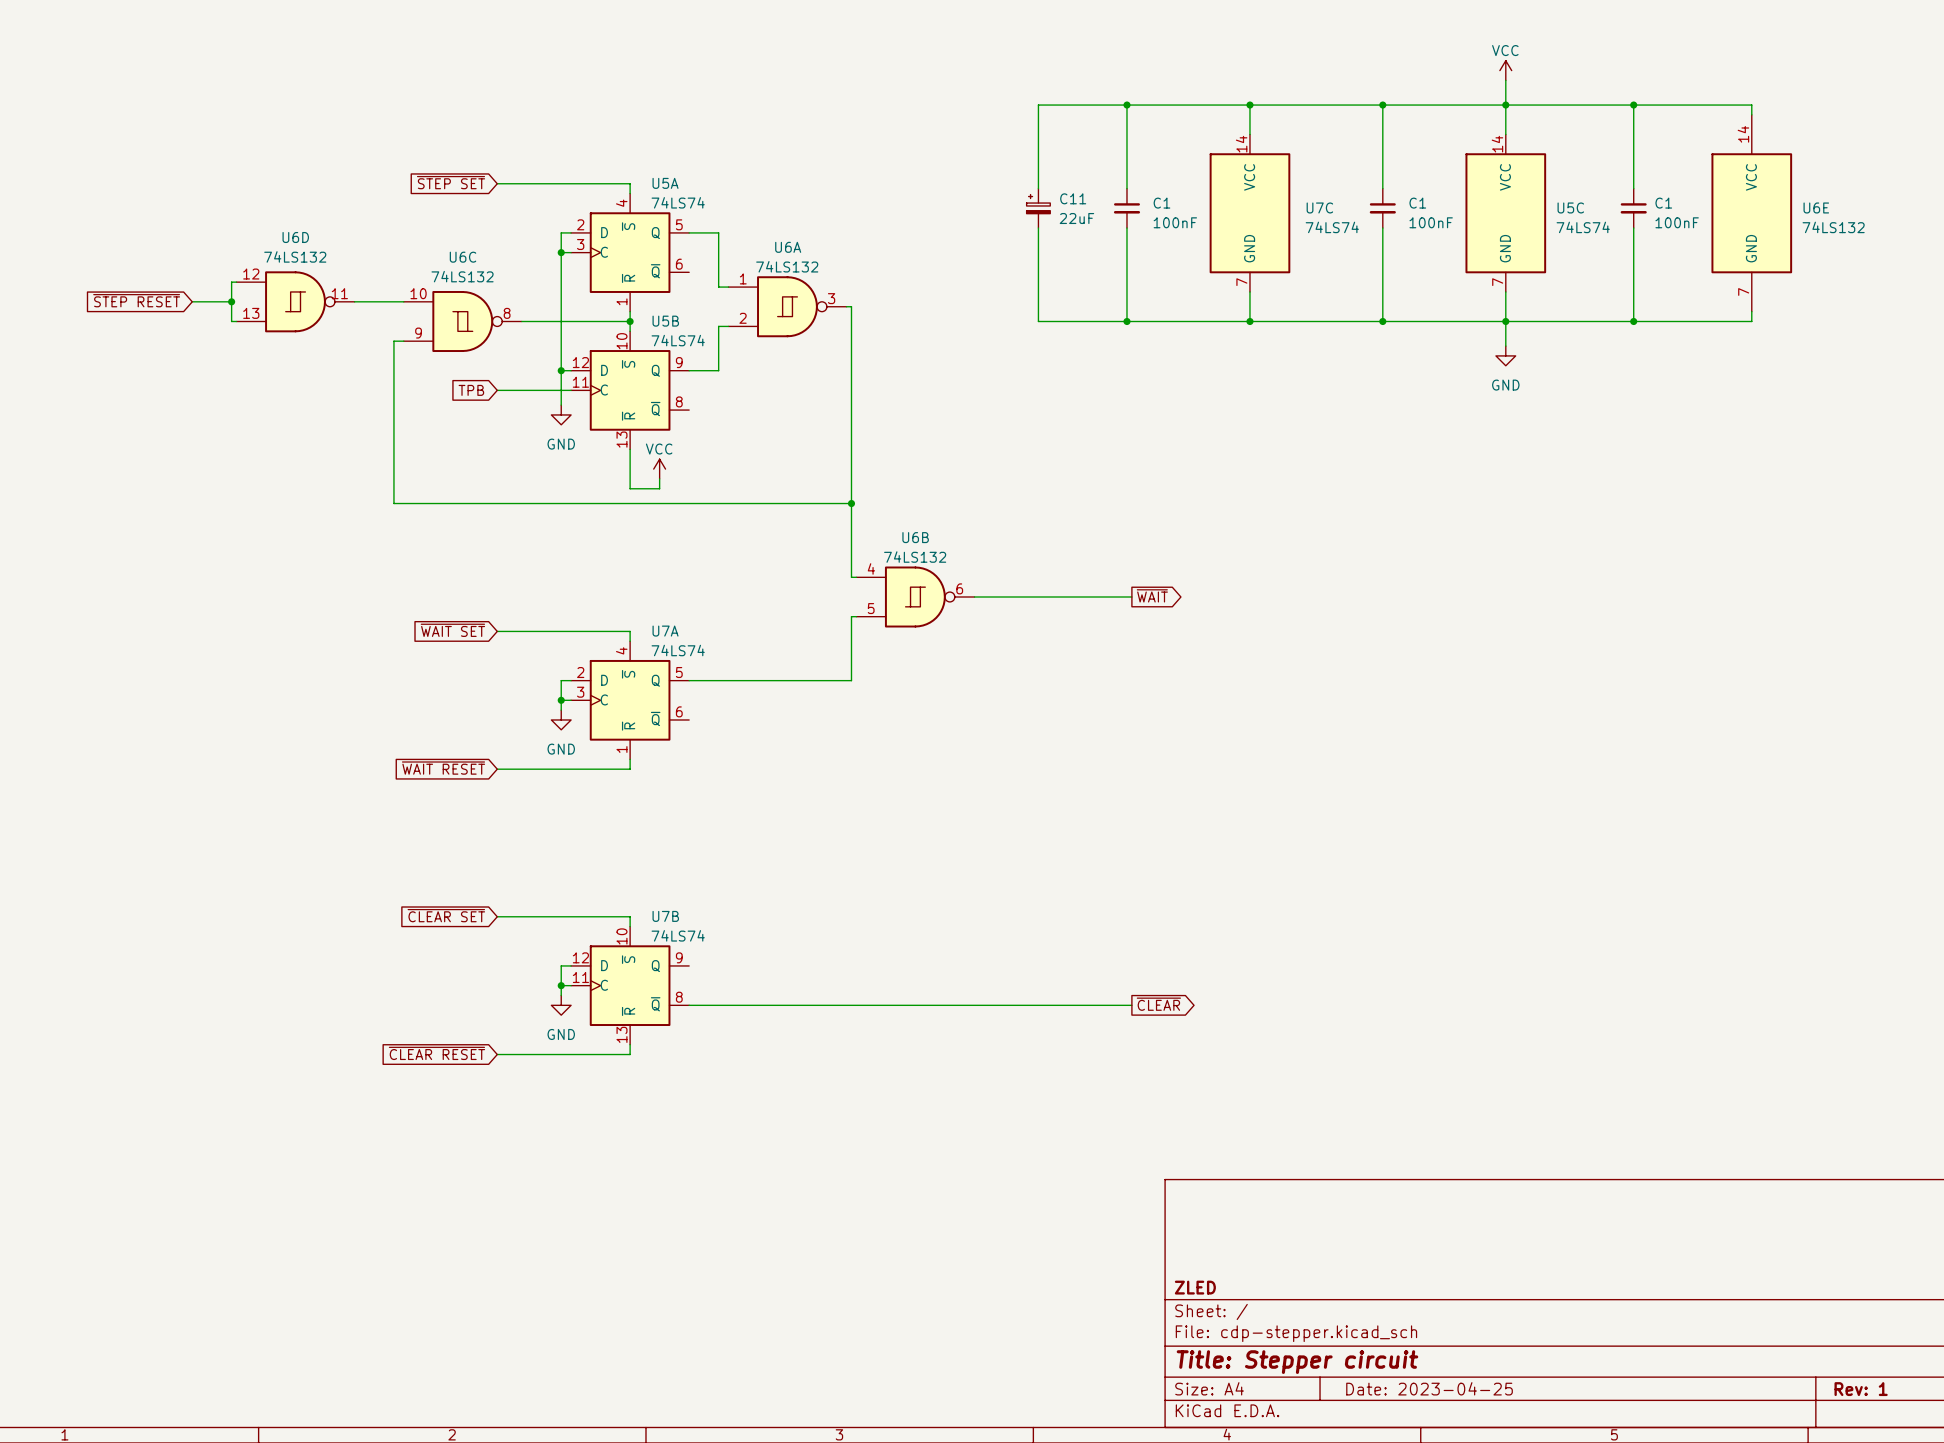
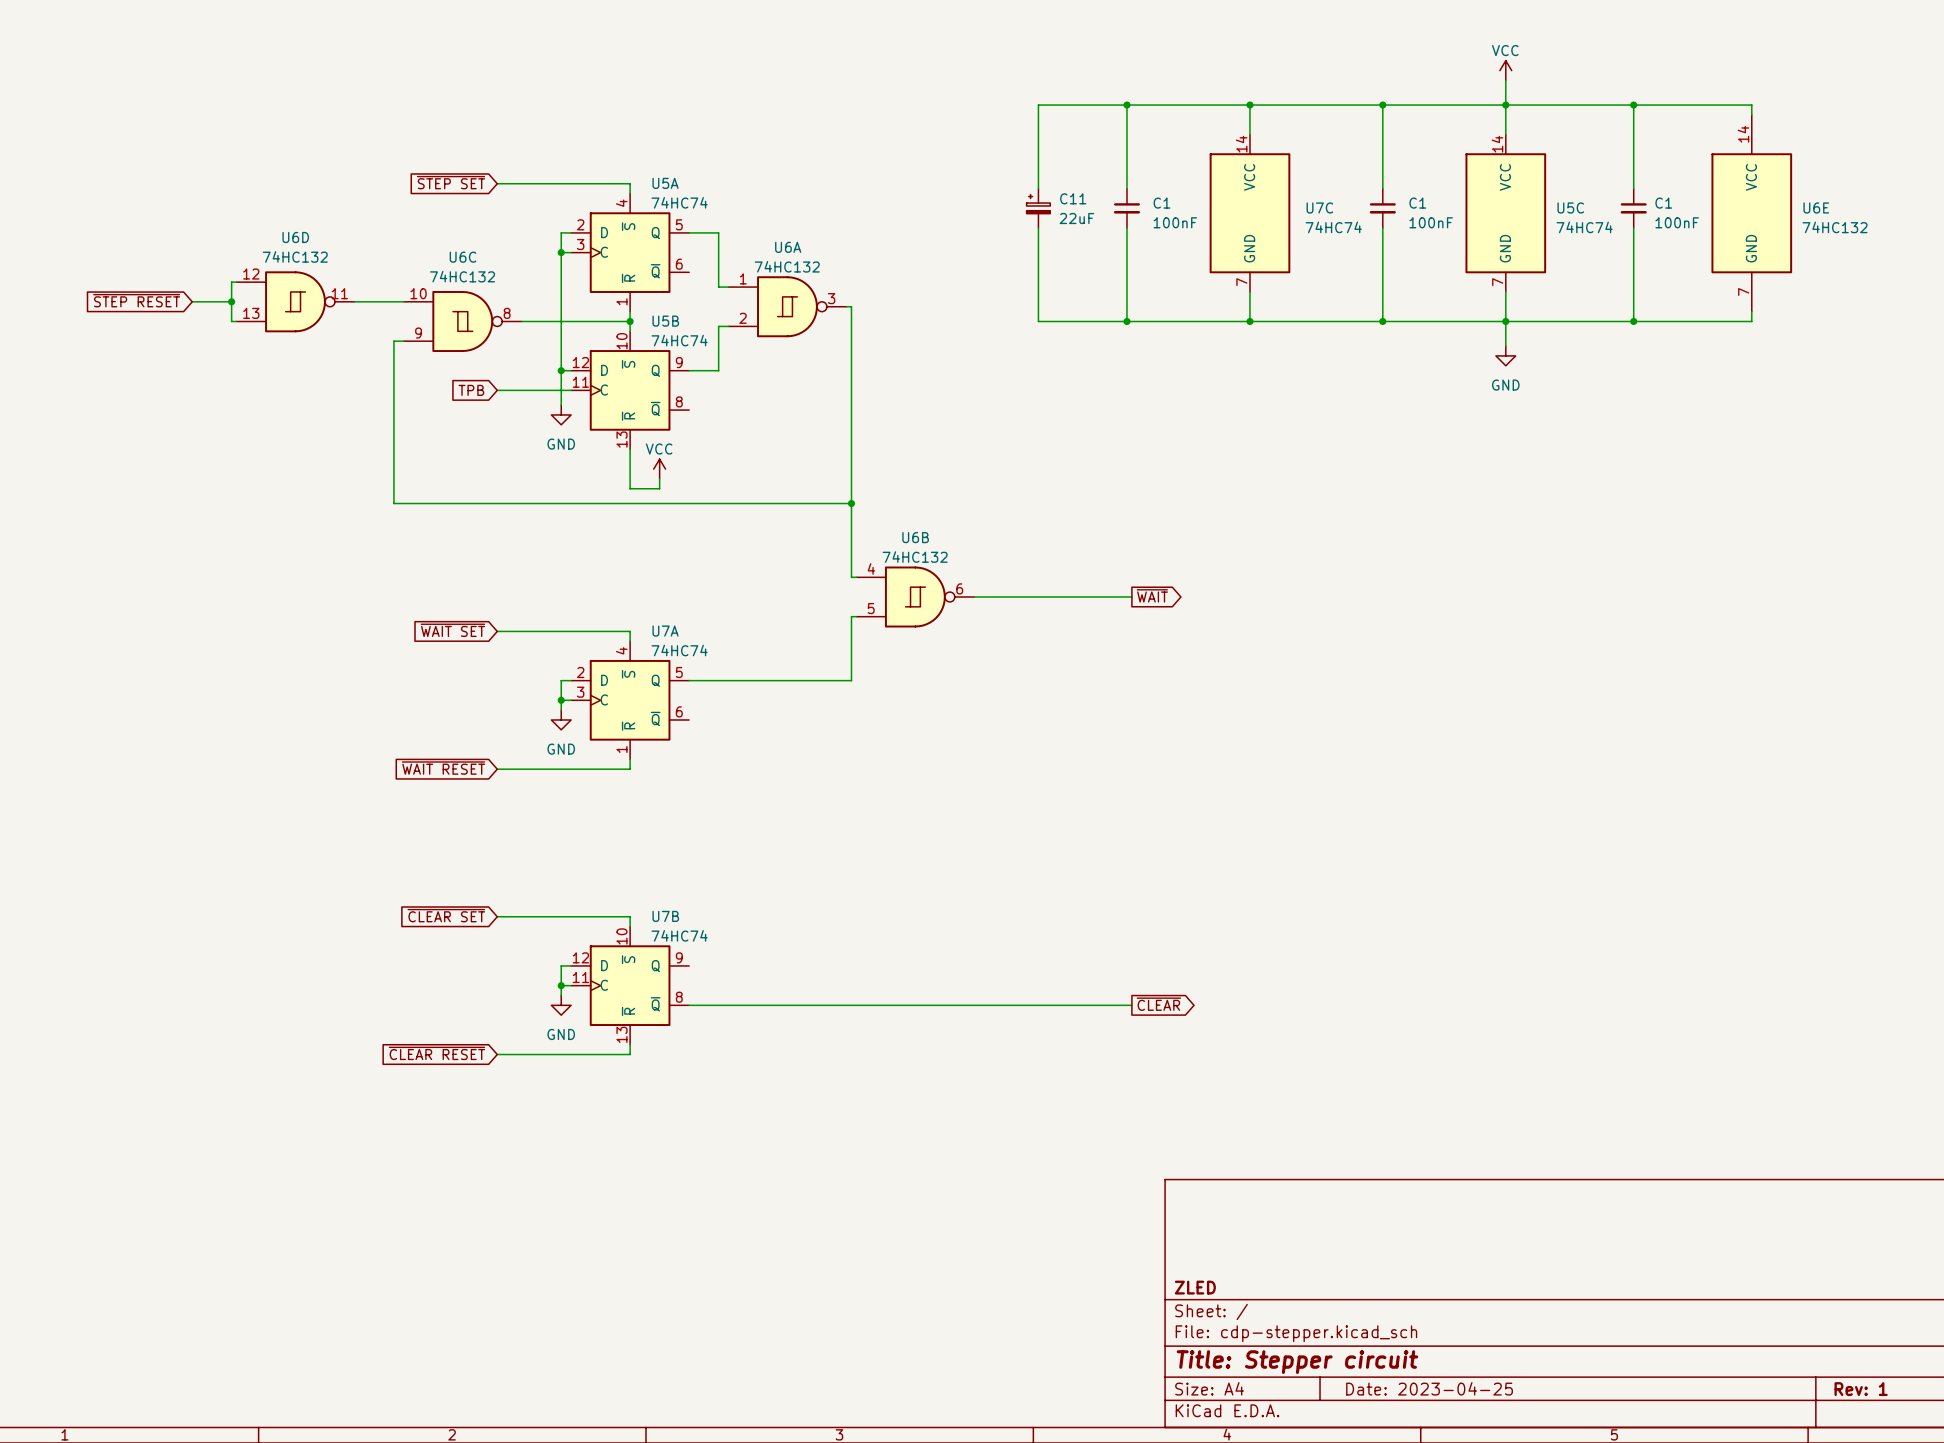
U5A value: 74LS74 (678, 202) -> 74HC74 (679, 202)
U7C value: 74LS74 (1332, 227) -> 74HC74 (1333, 227)
U5C value: 74LS74 (1583, 227) -> 74HC74 (1584, 227)
U6E value: 74LS132 (1833, 227) -> 74HC132 (1835, 227)
U6D value: 74LS132 (295, 256) -> 74HC132 (295, 256)
U6A value: 74LS132 (787, 266) -> 74HC132 (787, 266)
U6C value: 74LS132 (462, 276) -> 74HC132 (462, 276)
U5B value: 74LS74 (678, 340) -> 74HC74 (679, 340)
U6B value: 74LS132 (915, 557) -> 74HC132 (915, 557)
U7A value: 74LS74 (678, 650) -> 74HC74 (679, 650)
U7B value: 74LS74 (678, 935) -> 74HC74 (679, 935)

